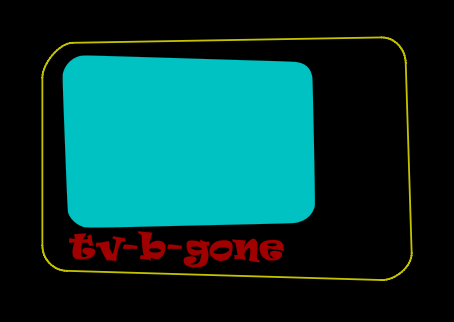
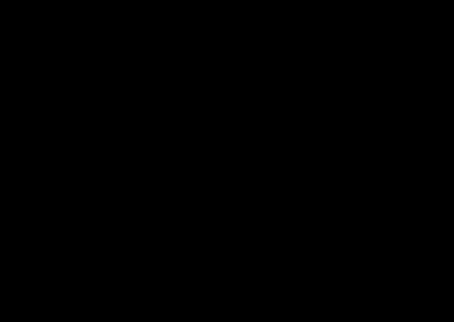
board edge: (381, 37) (72, 42) (62, 46) (48, 60) (42, 74) (42, 245) (46, 259) (55, 267) (66, 270) (381, 280) (397, 275) (407, 265) (411, 252) (405, 62) (403, 53) (398, 44) (390, 39) (381, 37) -> none
drawing: [62, 55, 315, 268] -> none

